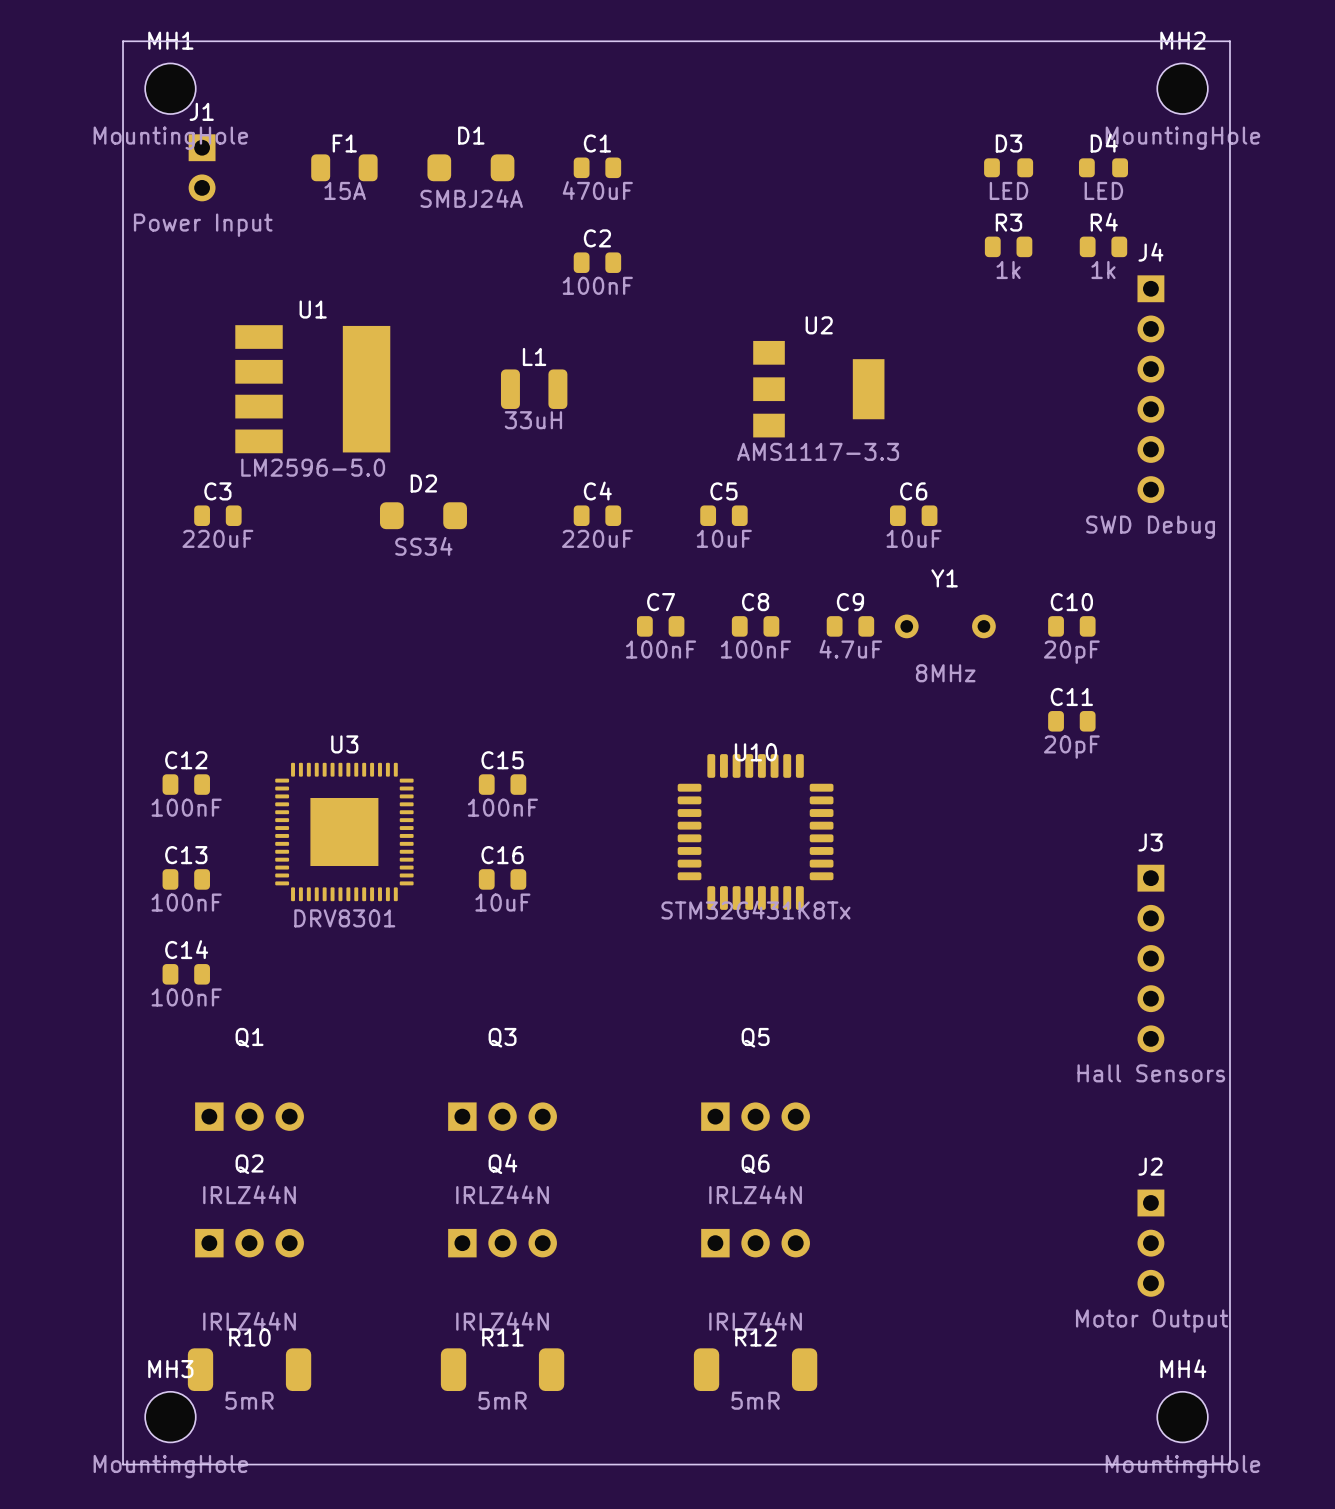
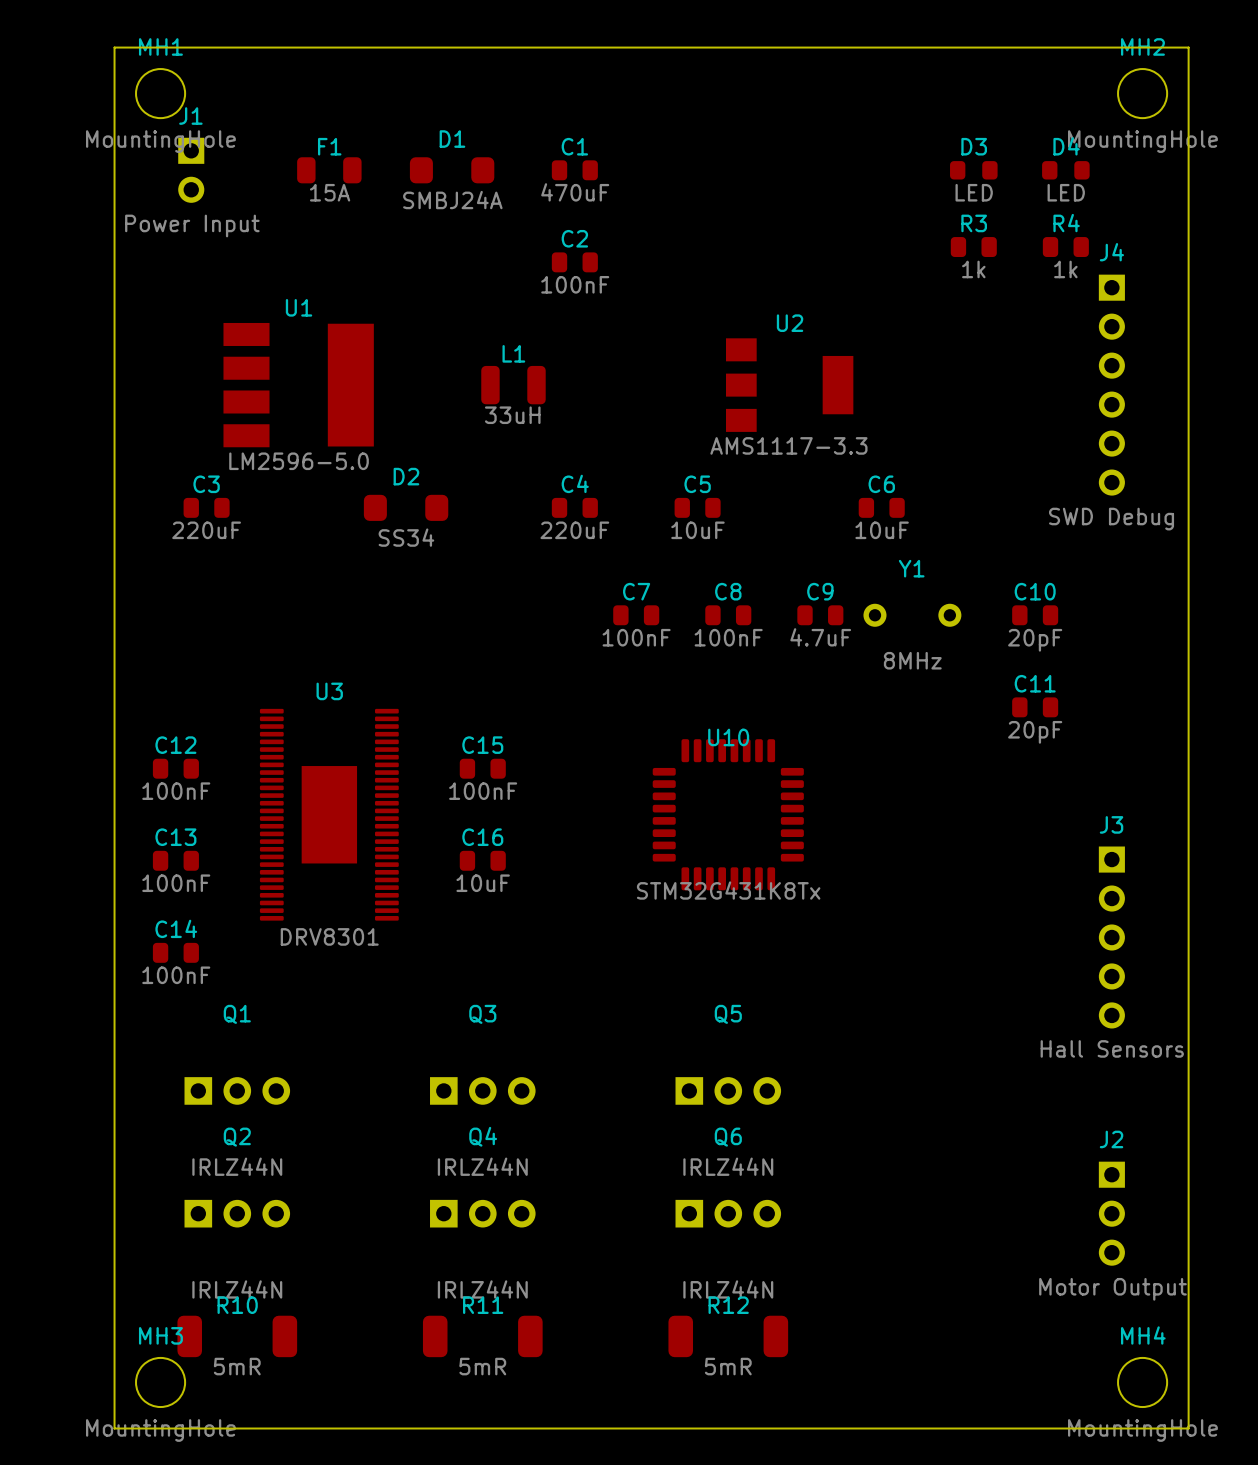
U3 name position: U3 (344, 744) -> U3 (329, 691)
U3 footprint: [275, 762, 414, 902] -> [259, 708, 399, 921]
U3 value position: DRV8301 (344, 918) -> DRV8301 (329, 936)

